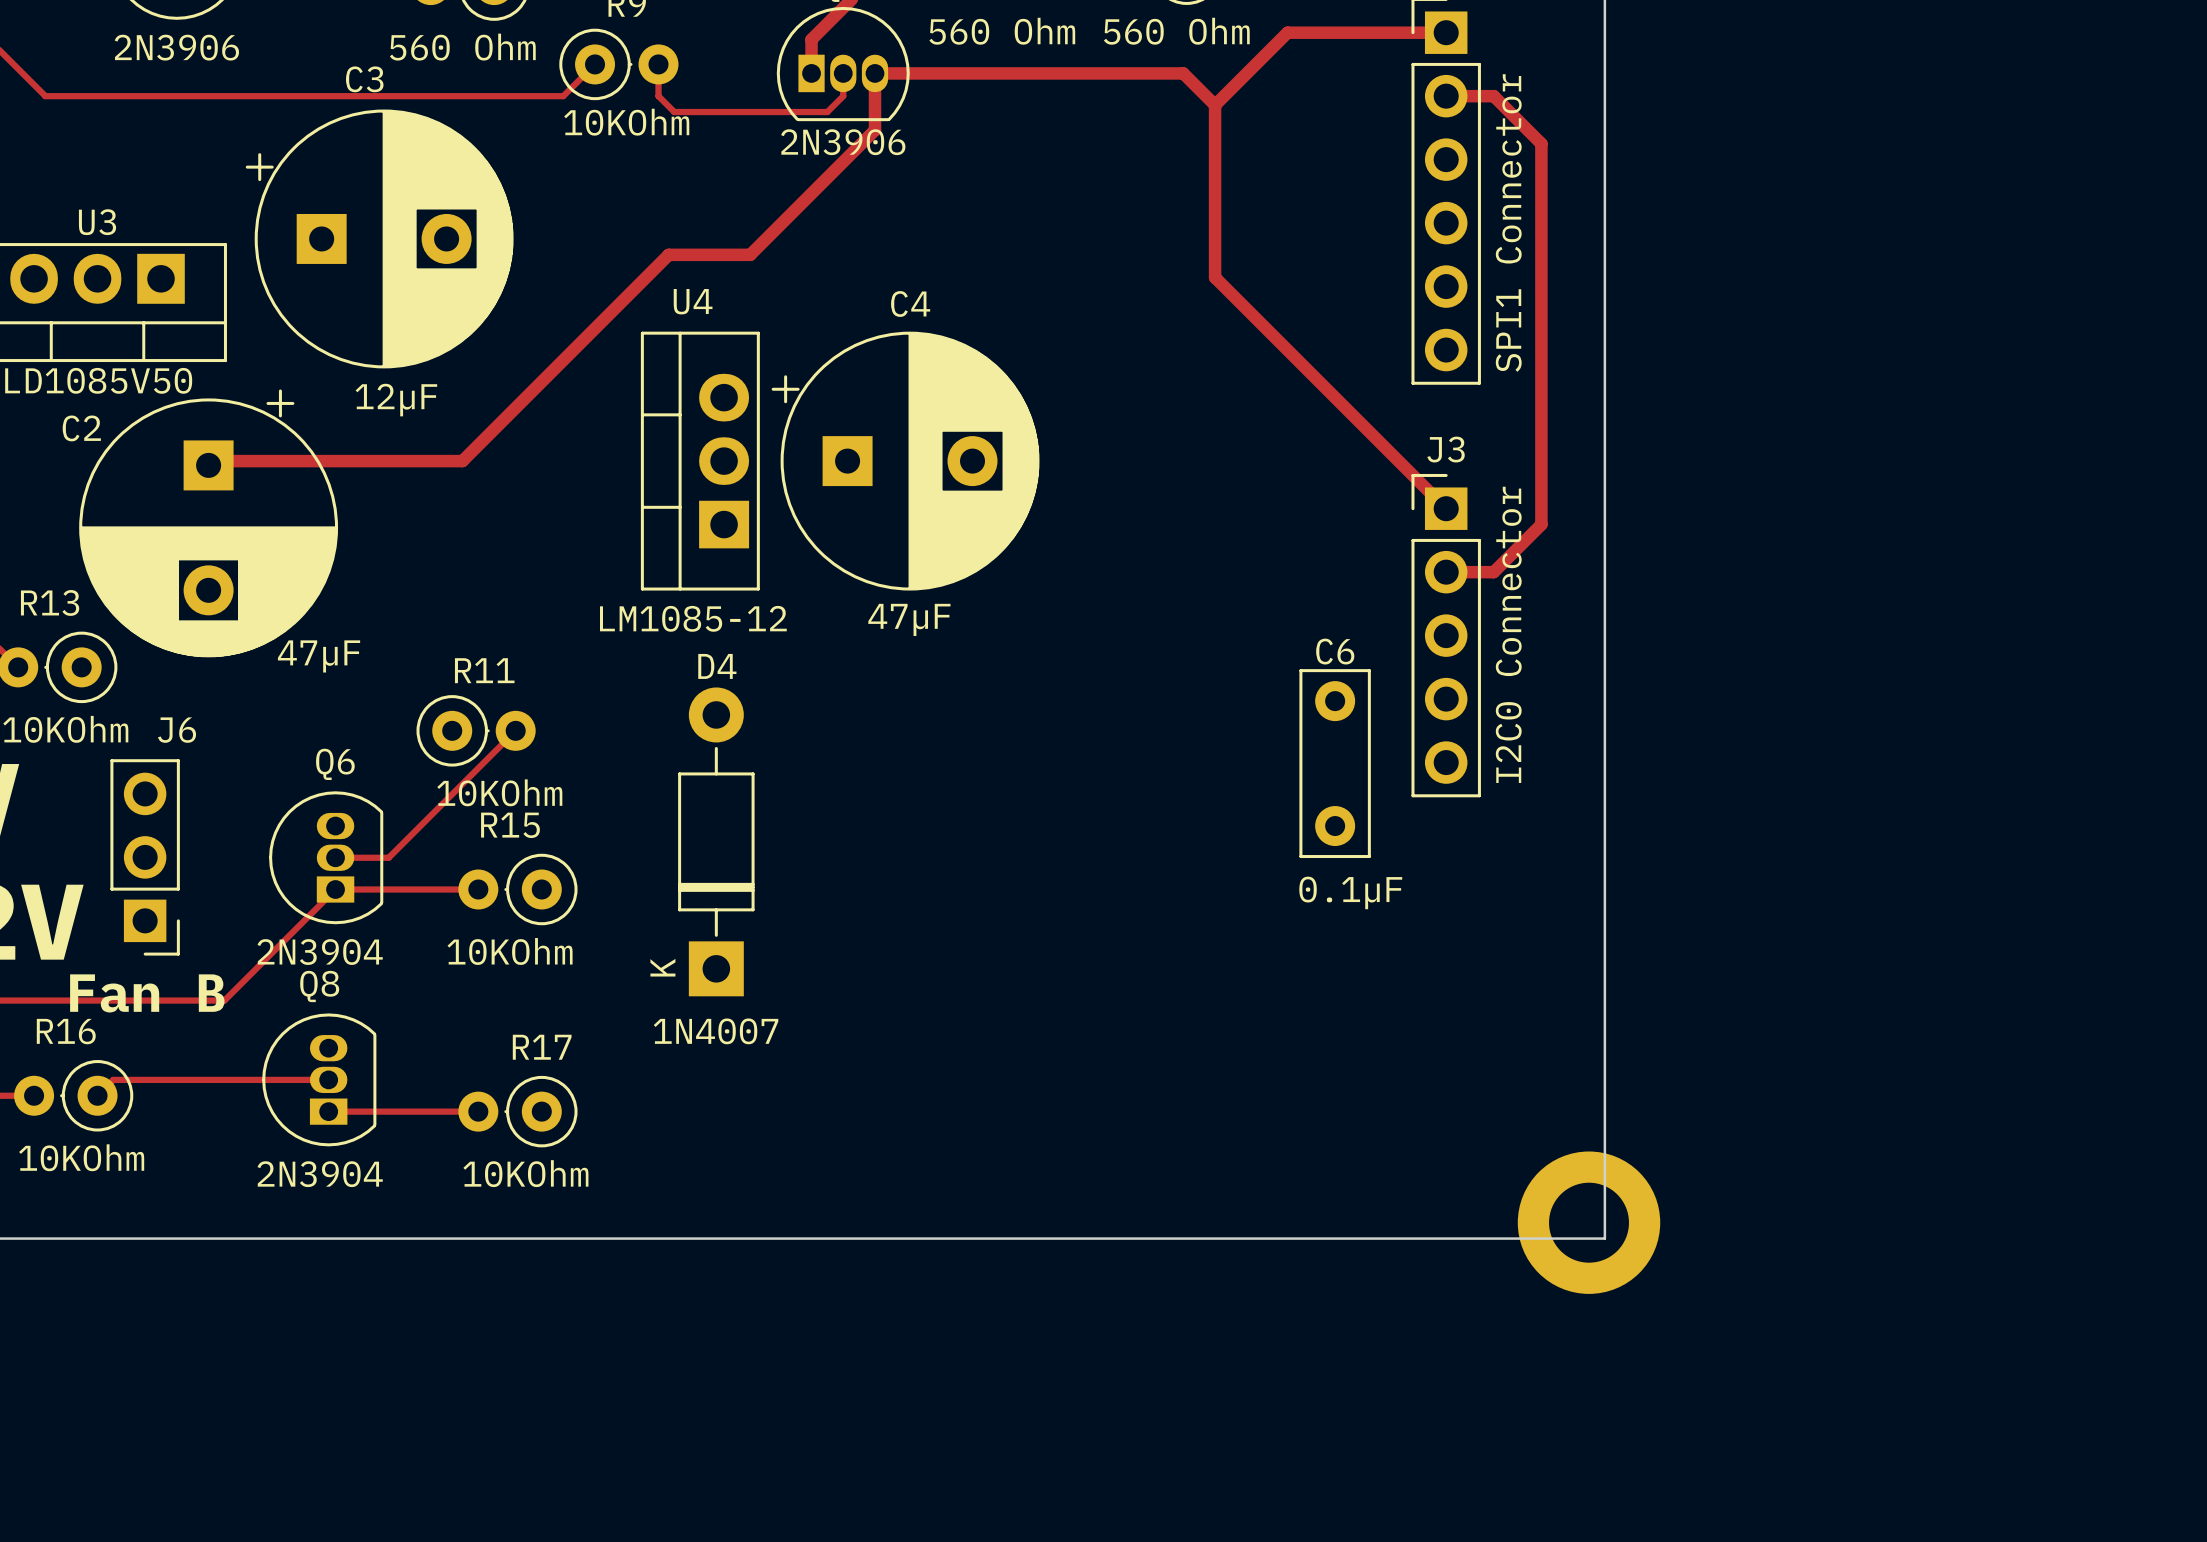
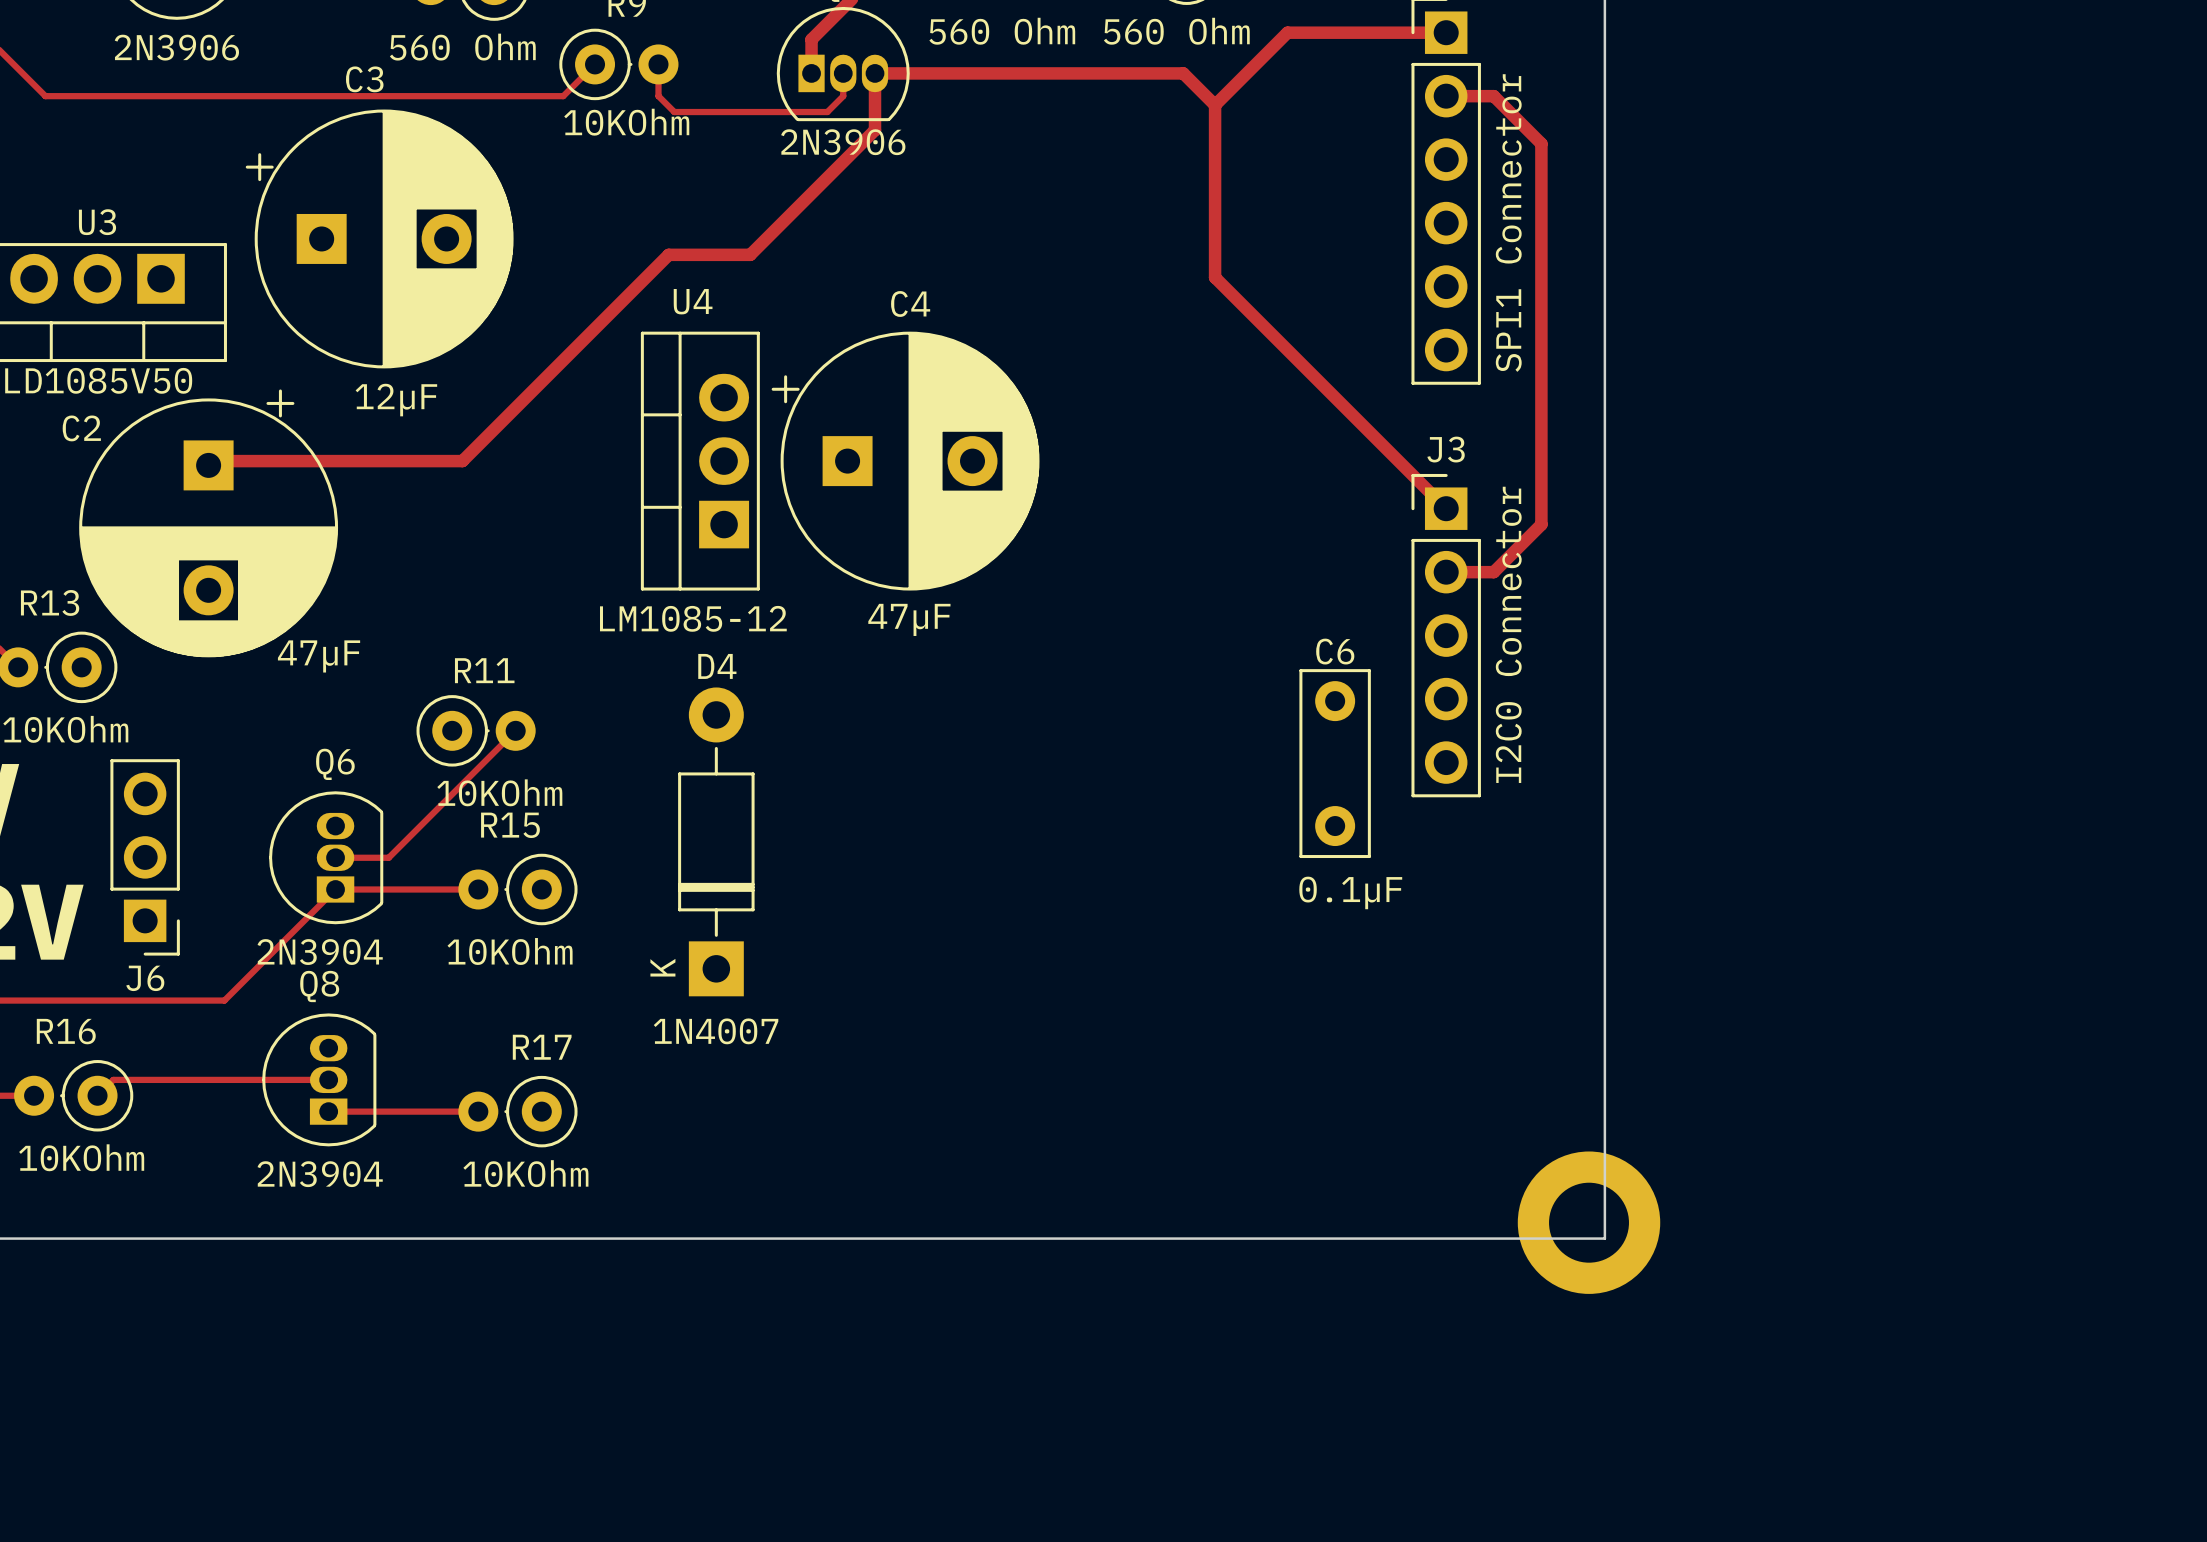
J6 name position: J6 (177, 730) -> J6 (145, 978)
text: Fan B (147, 993) -> none

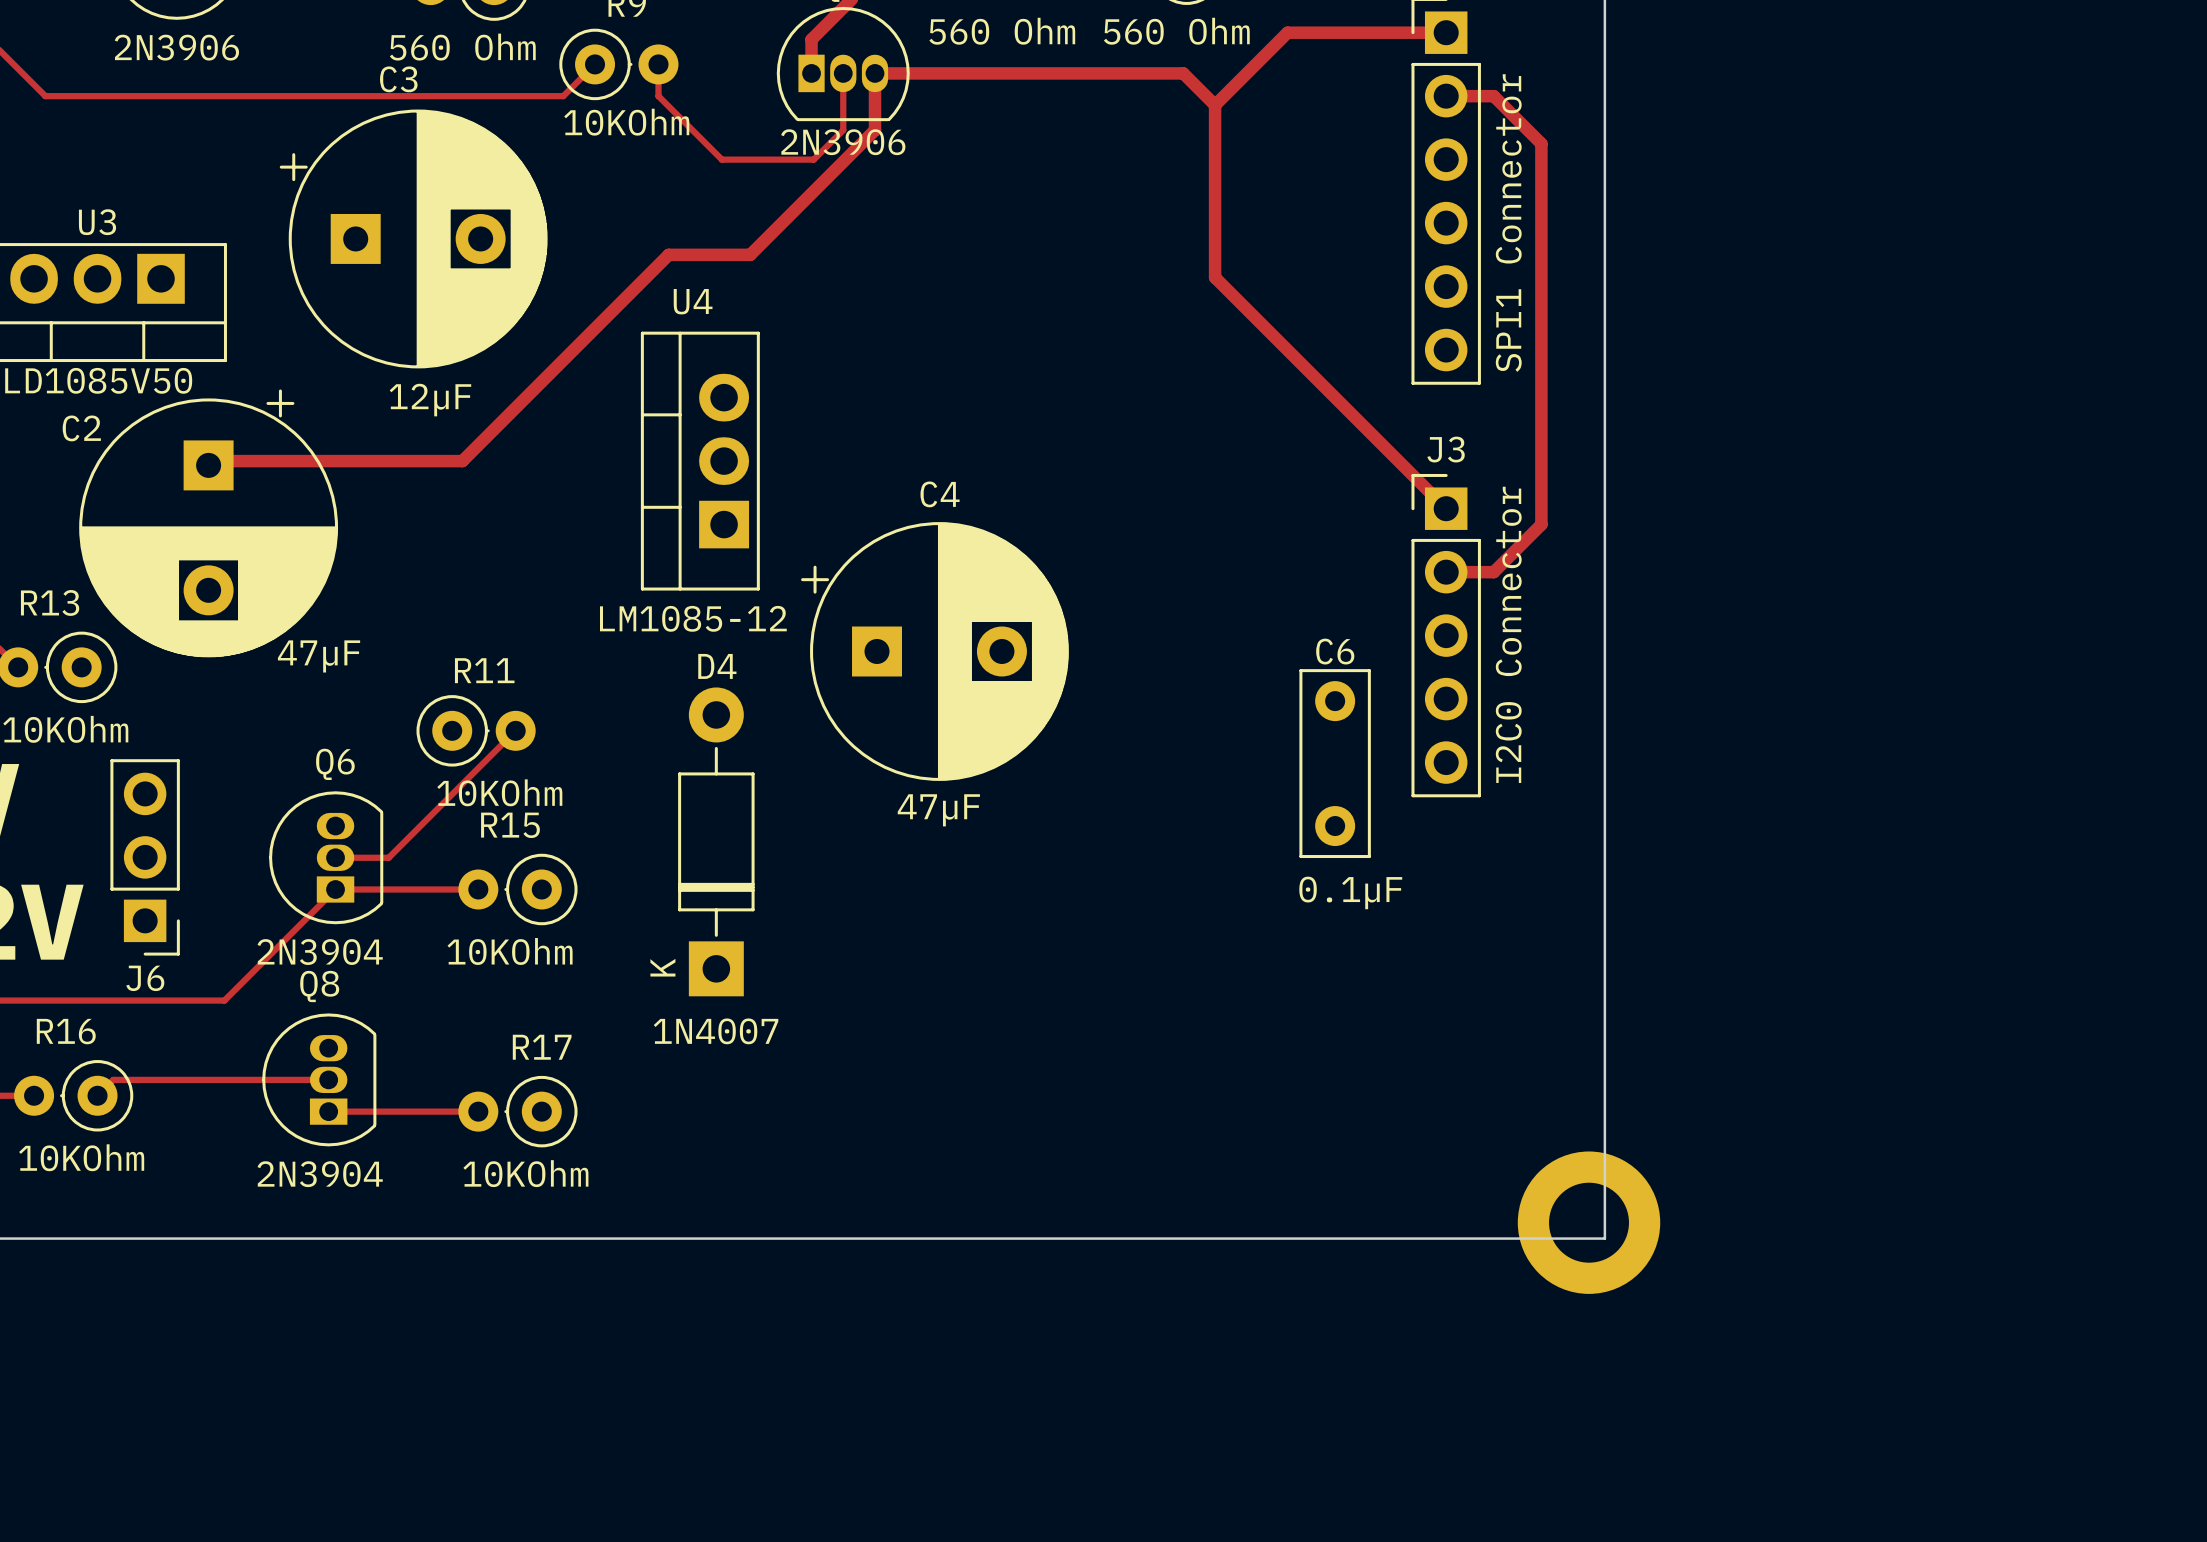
track: (843, 96) (827, 112) (674, 112) -> (843, 96) (843, 130) (813, 159) (721, 159) (674, 112)
C3 position: (379, 238) -> (413, 238)
C4 position: (905, 461) -> (934, 651)

